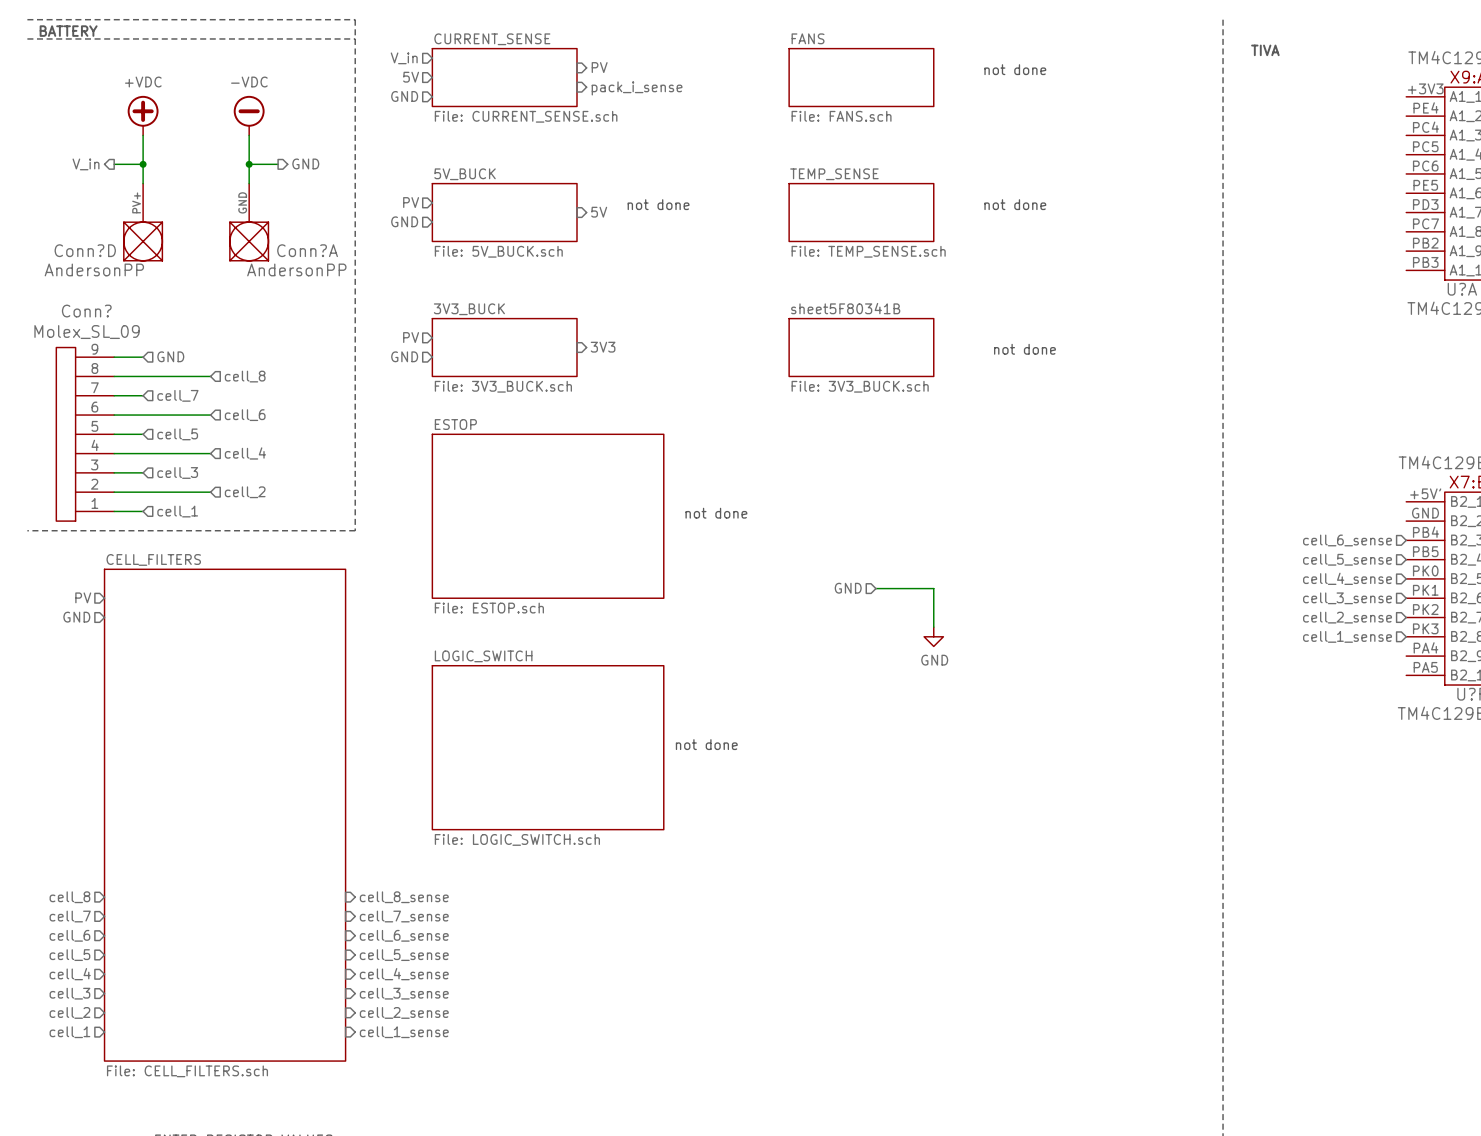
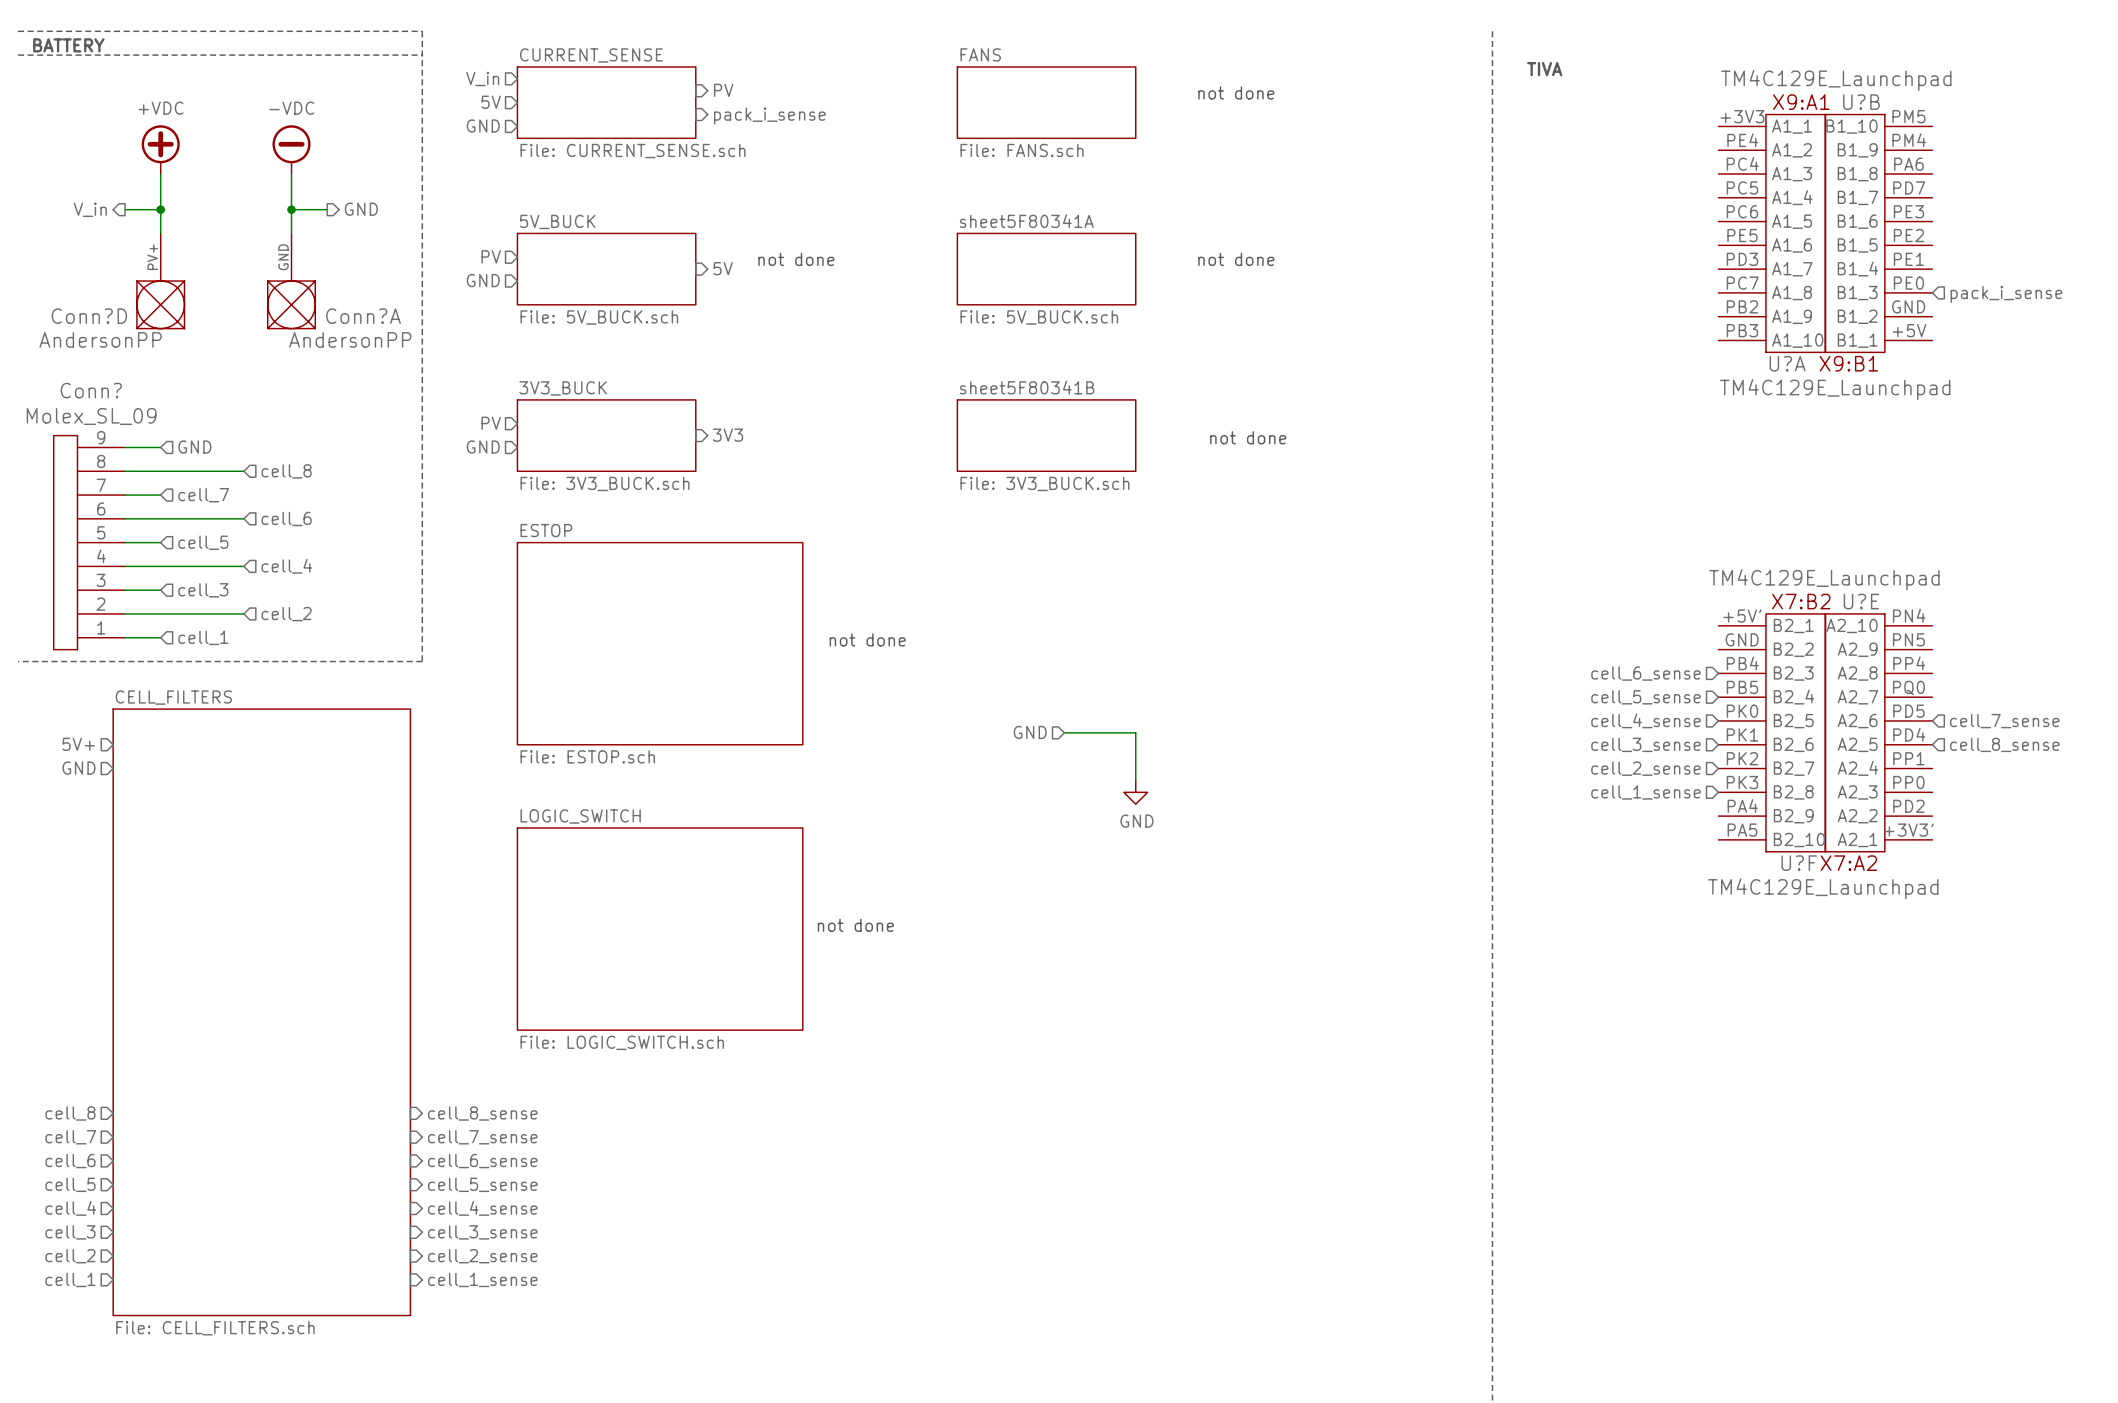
sheet TEMP_SENSE name: TEMP_SENSE (834, 174) -> sheet5F80341A (1026, 221)
sheet TEMP_SENSE value: File: TEMP_SENSE.sch (868, 251) -> File: 5V_BUCK.sch (1039, 317)
hierarchical label: PV (83, 597) -> 5V+ (78, 744)

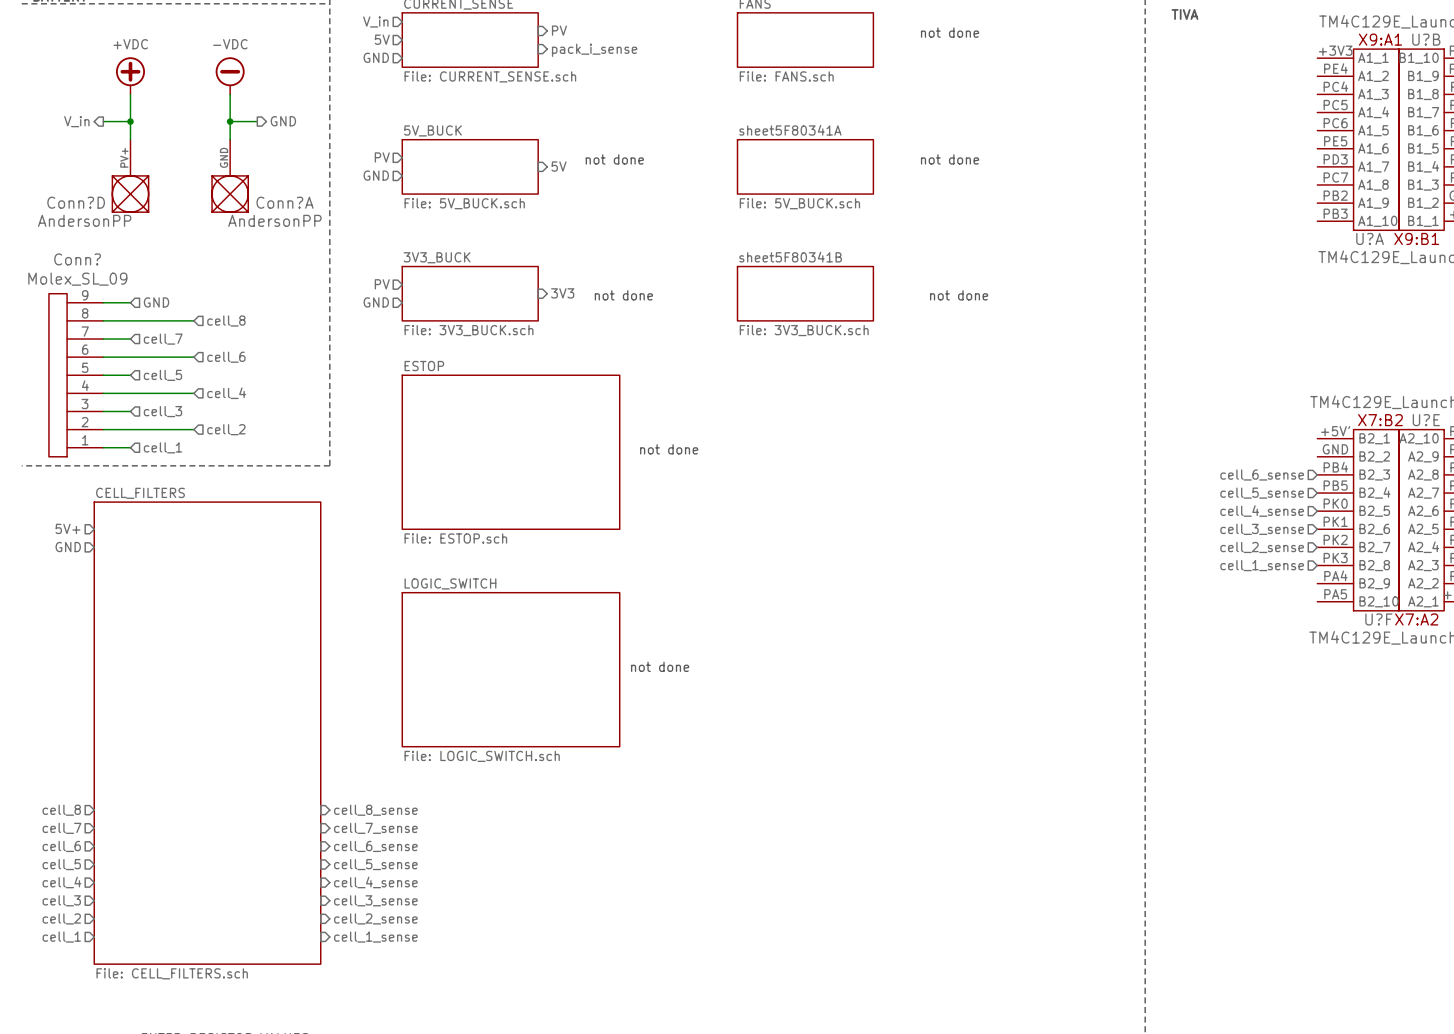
text: none -> not done (623, 295)
hierarchical label: GND (1030, 732) -> none
wire: (1064, 732) (1135, 732) (1135, 780) -> none
power symbol: GND (1135, 792) -> none

